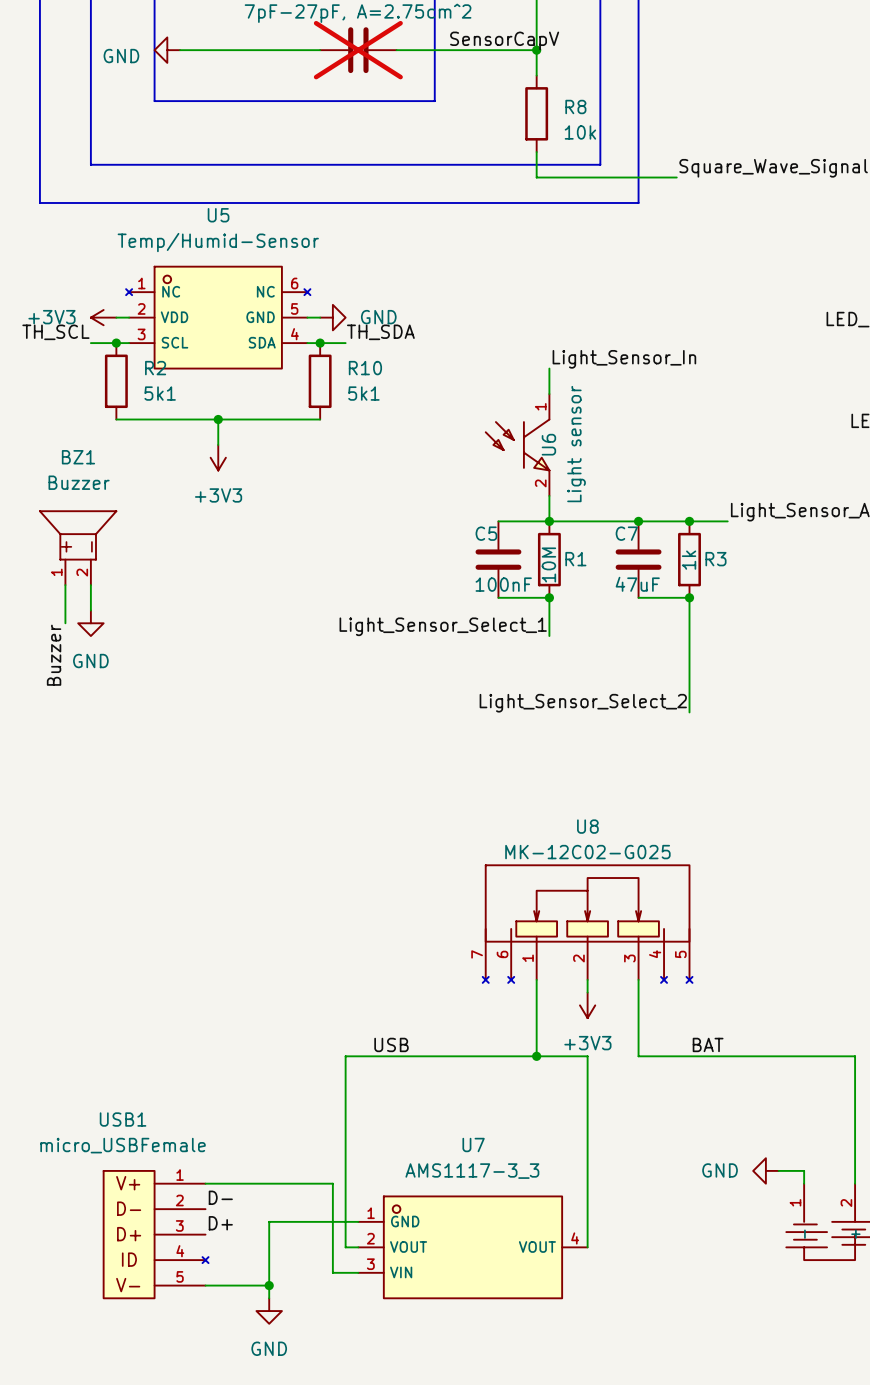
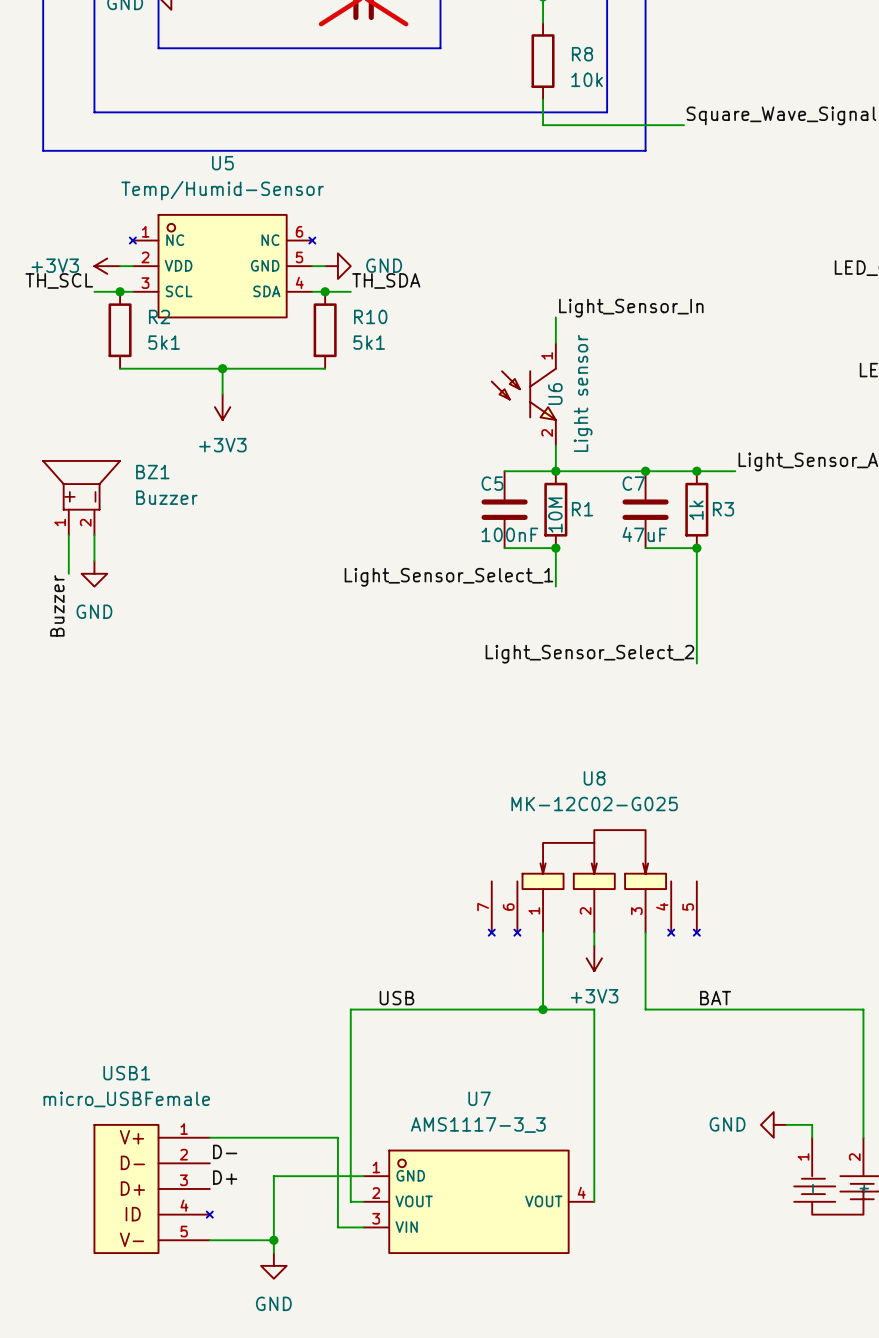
BZ1 name position: BZ1 (78, 457) -> BZ1 (152, 472)
BZ1 value position: Buzzer (79, 482) -> Buzzer (166, 497)
U8 symbol: [482, 865, 693, 983] -> [488, 830, 700, 936]
USB1 symbol: [103, 1170, 209, 1299] -> [94, 1124, 213, 1254]

